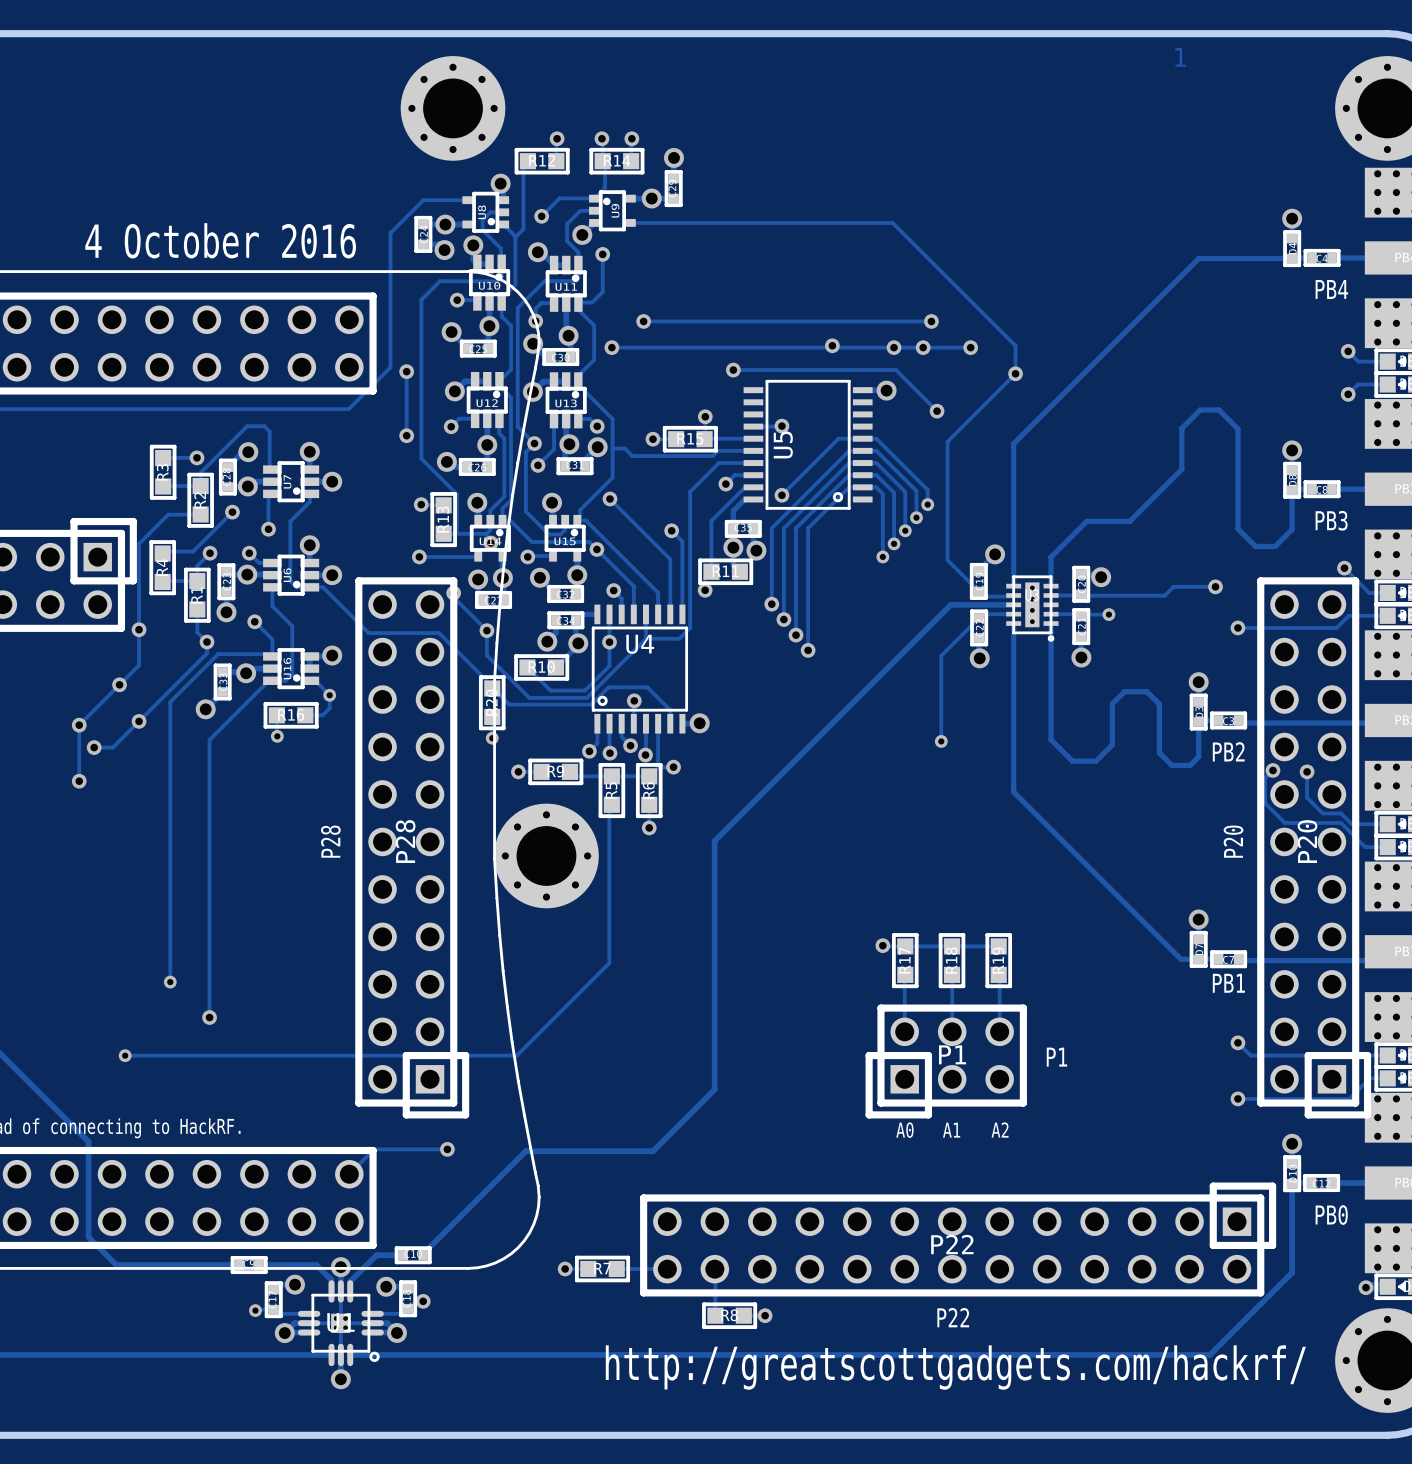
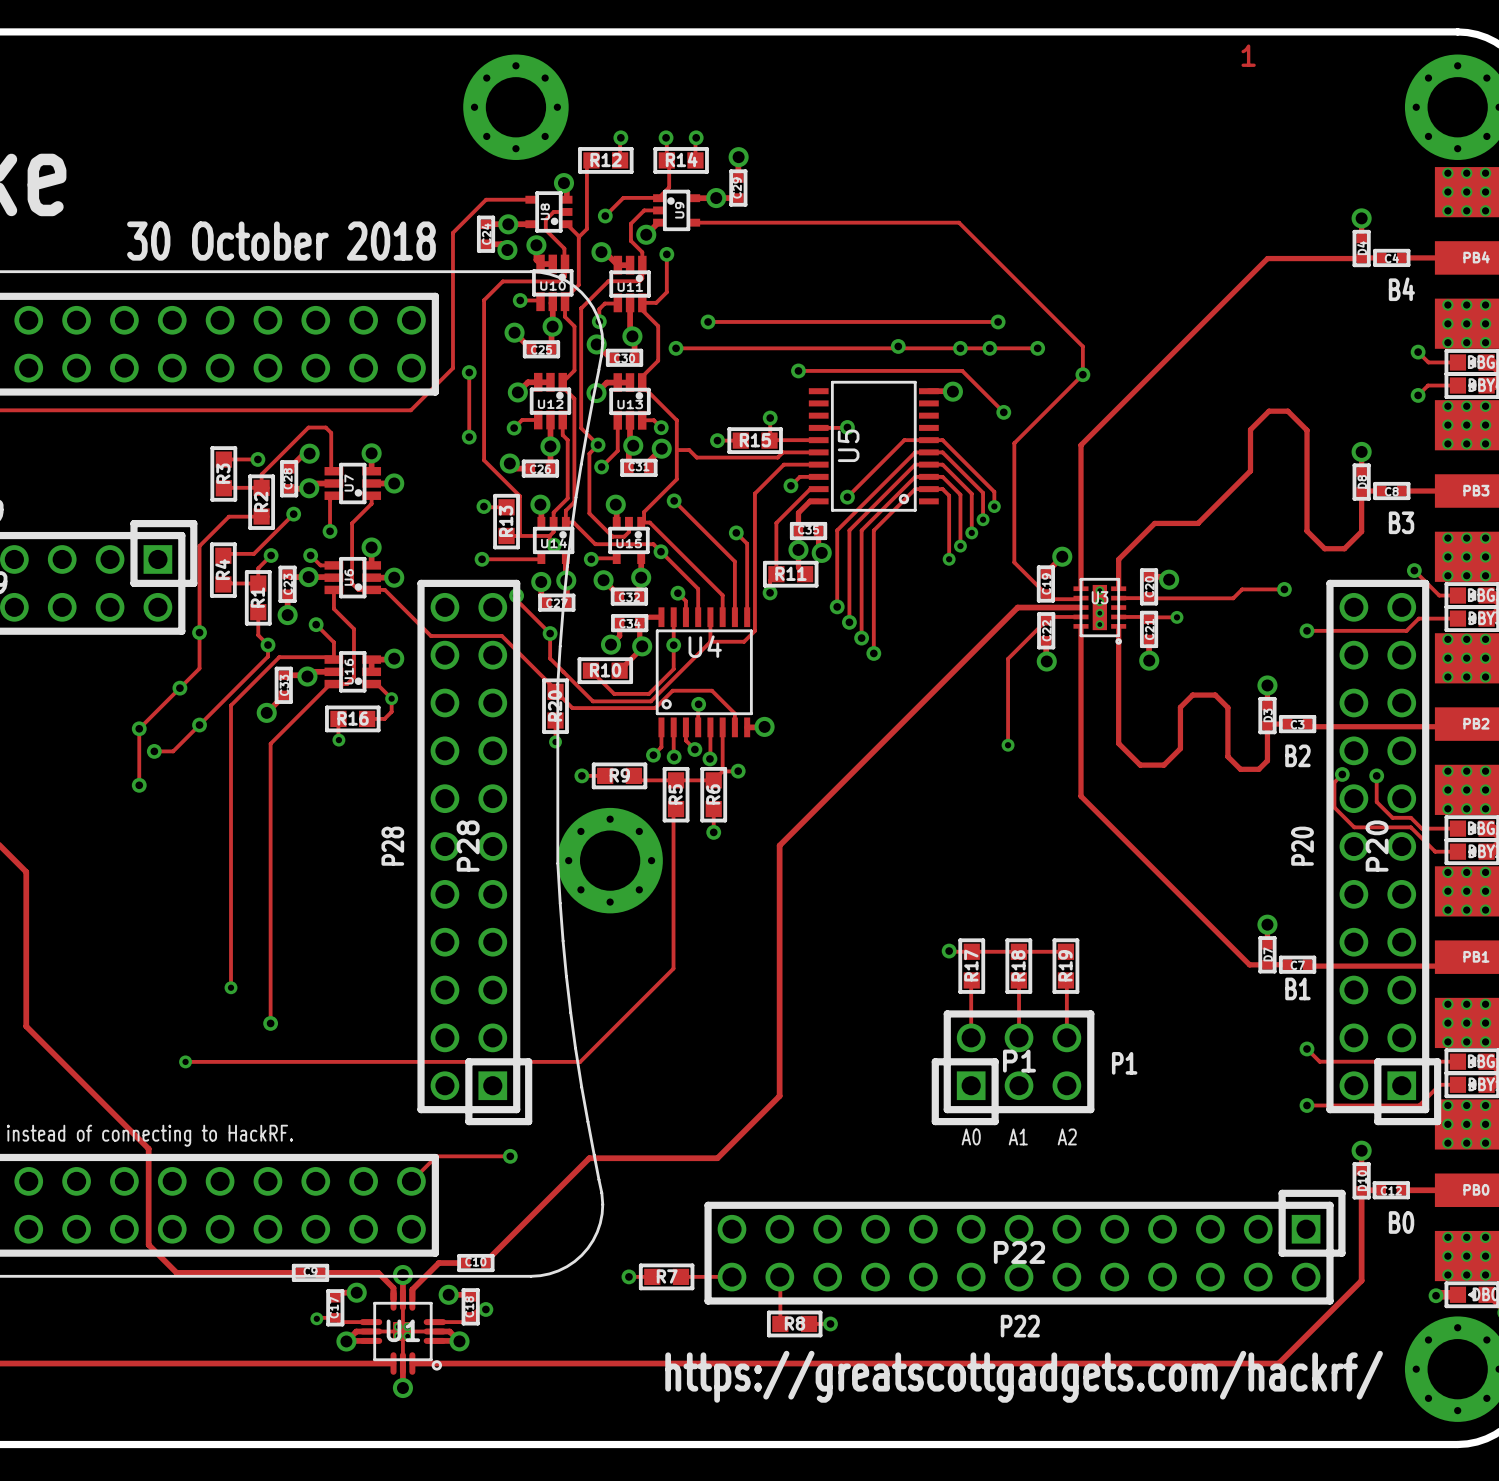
text: 4 October 2016 (220, 240) -> 30 October 2018 (281, 241)
text: PB4 (1331, 289) -> B4 (1401, 289)
text: PB3 (1331, 520) -> B3 (1401, 522)
text: PB2 (1228, 751) -> B2 (1297, 755)
text: PB1 (1228, 983) -> B1 (1297, 988)
text: PB0 (1331, 1215) -> B0 (1401, 1222)
text: http://greatscottgadgets.com/hackrf/ (955, 1367) -> https://greatscottgadgets.com/hackrf/ (1024, 1376)

